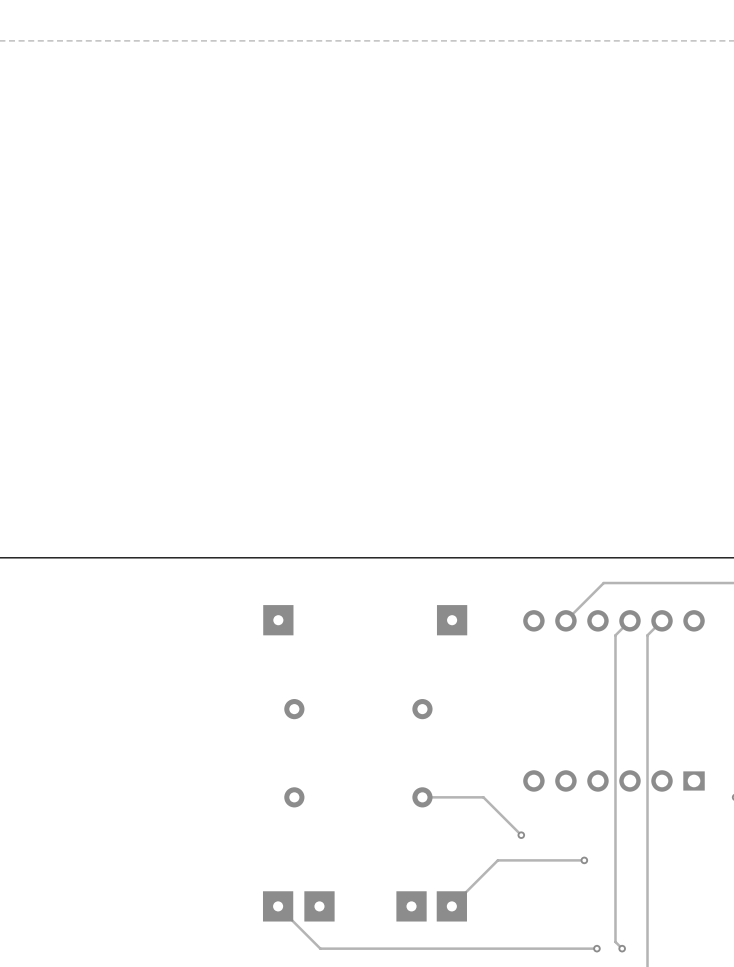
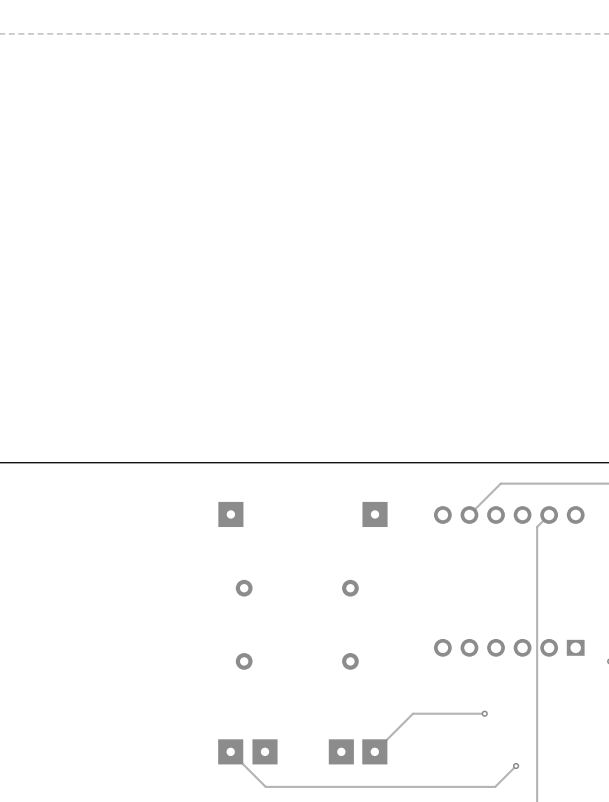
track: (629, 620) (615, 635) (615, 941) (622, 948) -> none
track: (422, 797) (483, 797) (521, 835) -> none
via: (521, 835) -> none
track: none -> (516, 766) (495, 786)
via: none -> (516, 766)
via: (596, 948) -> none
via: (622, 948) -> none

